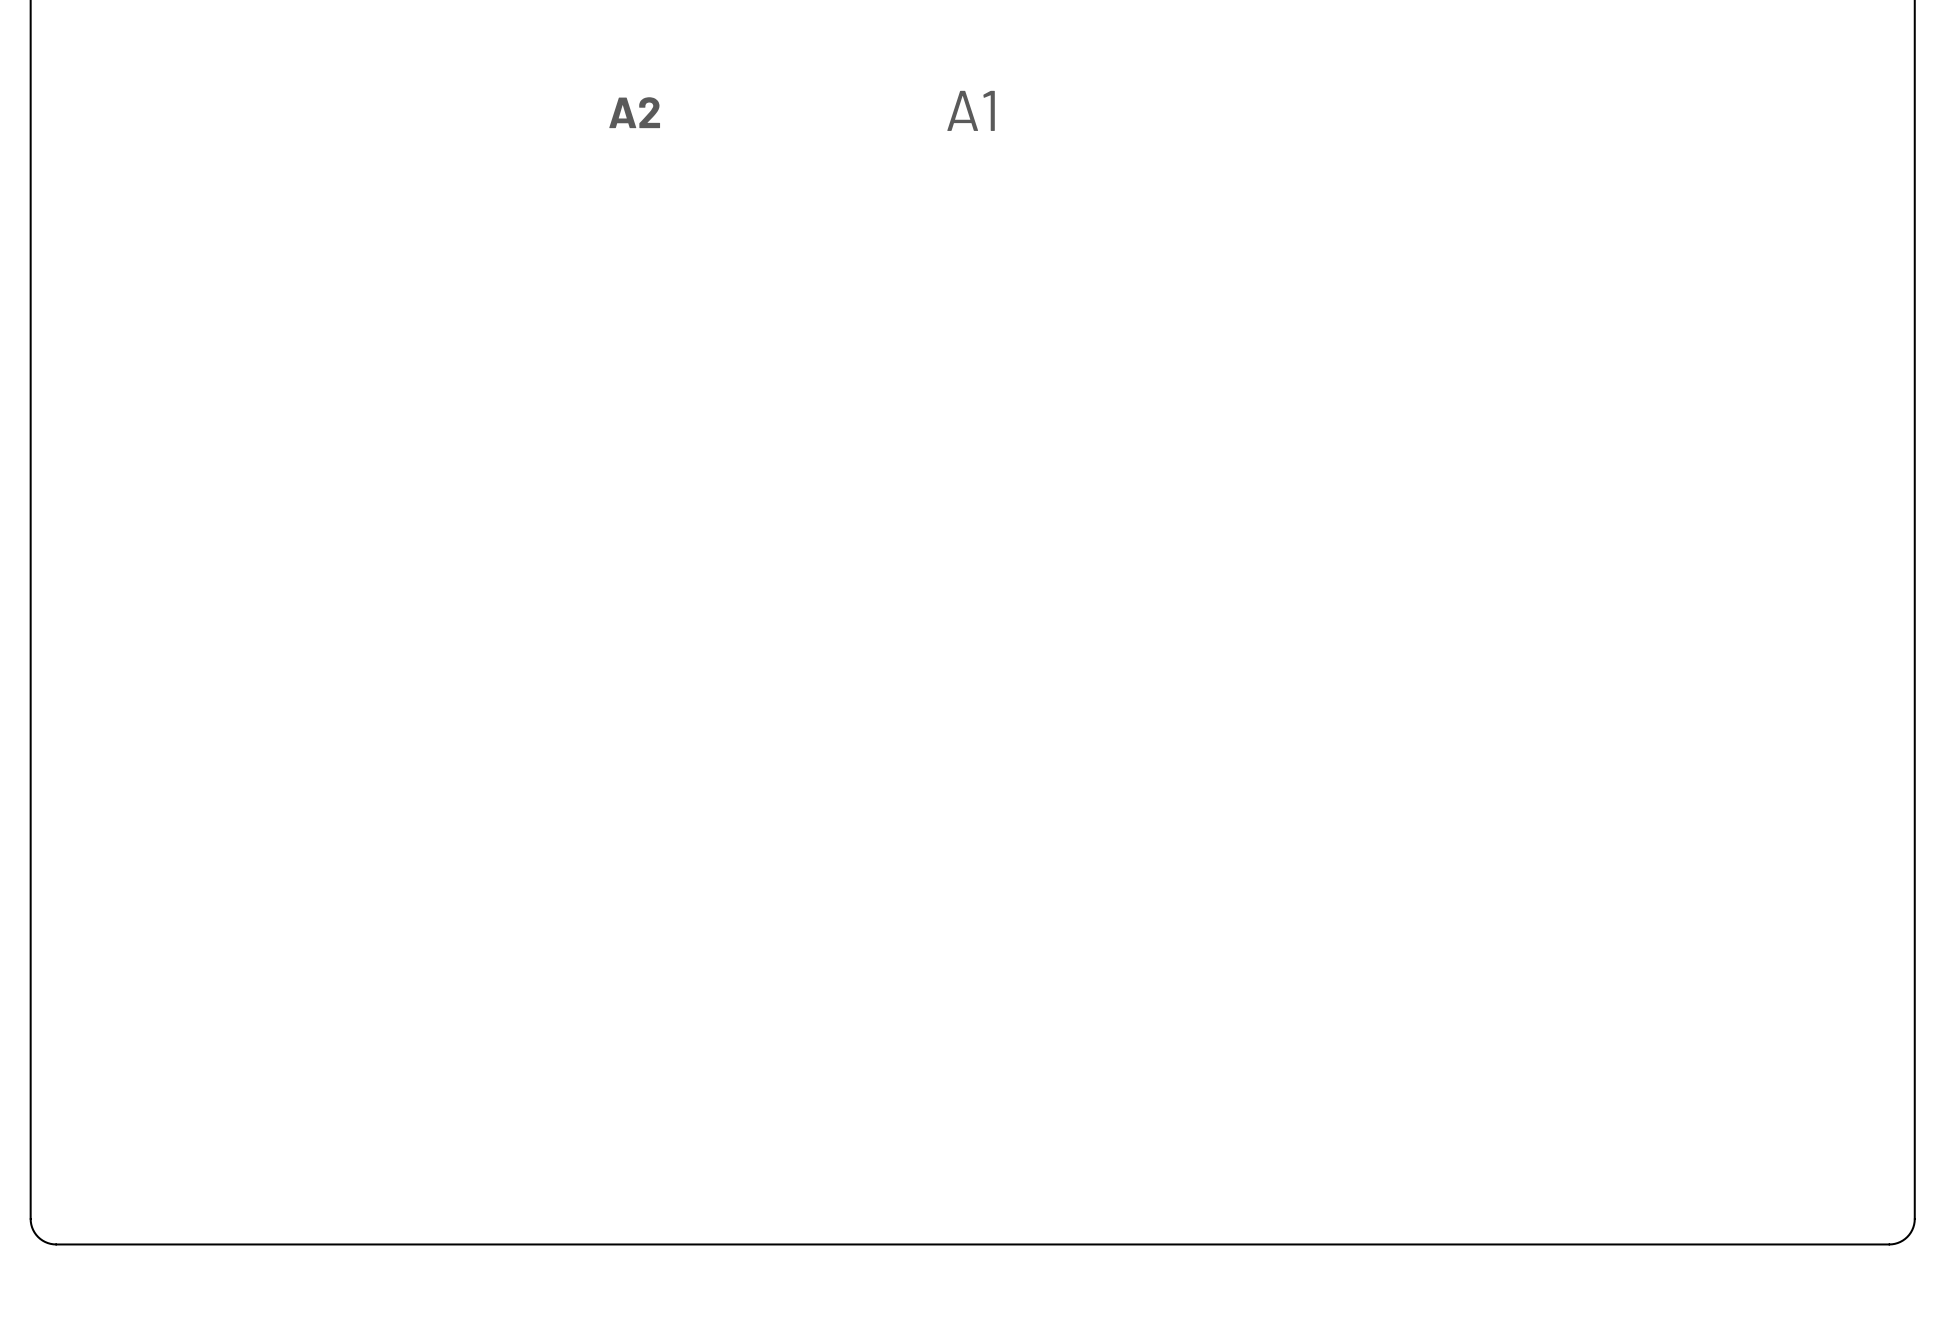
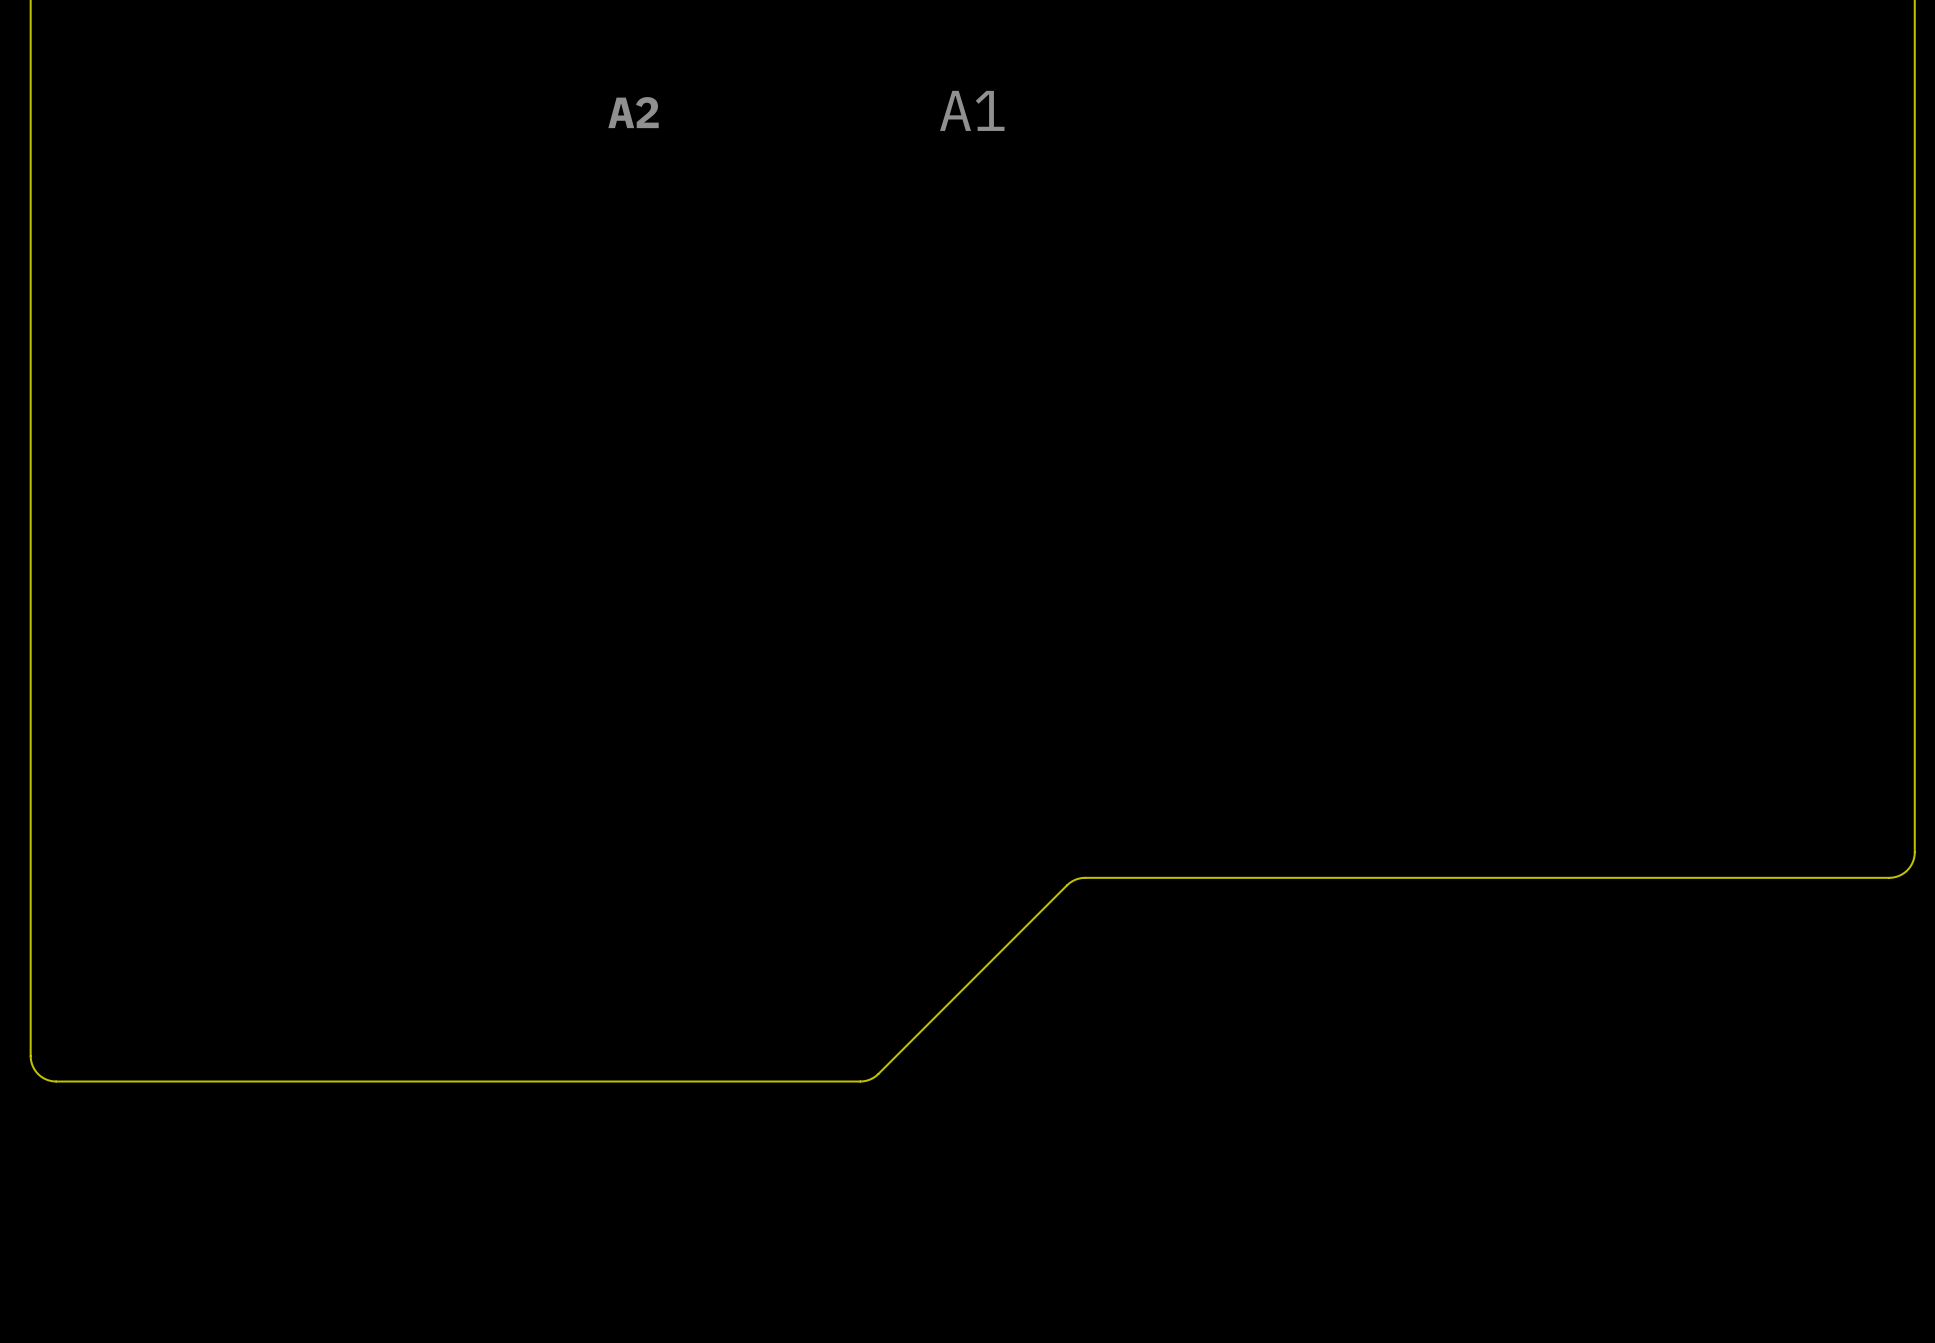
board edge: (1914, 852) (1914, 1221) (1907, 1237) (1892, 1244) (53, 1244) (38, 1237) (30, 1221) (30, 1056) -> (1914, 852) (1912, 863) (1907, 870) (1897, 876) (1889, 877) (1078, 878) (1067, 885) (878, 1074) (863, 1081) (56, 1081) (47, 1080) (38, 1074) (33, 1067) (30, 1056)

